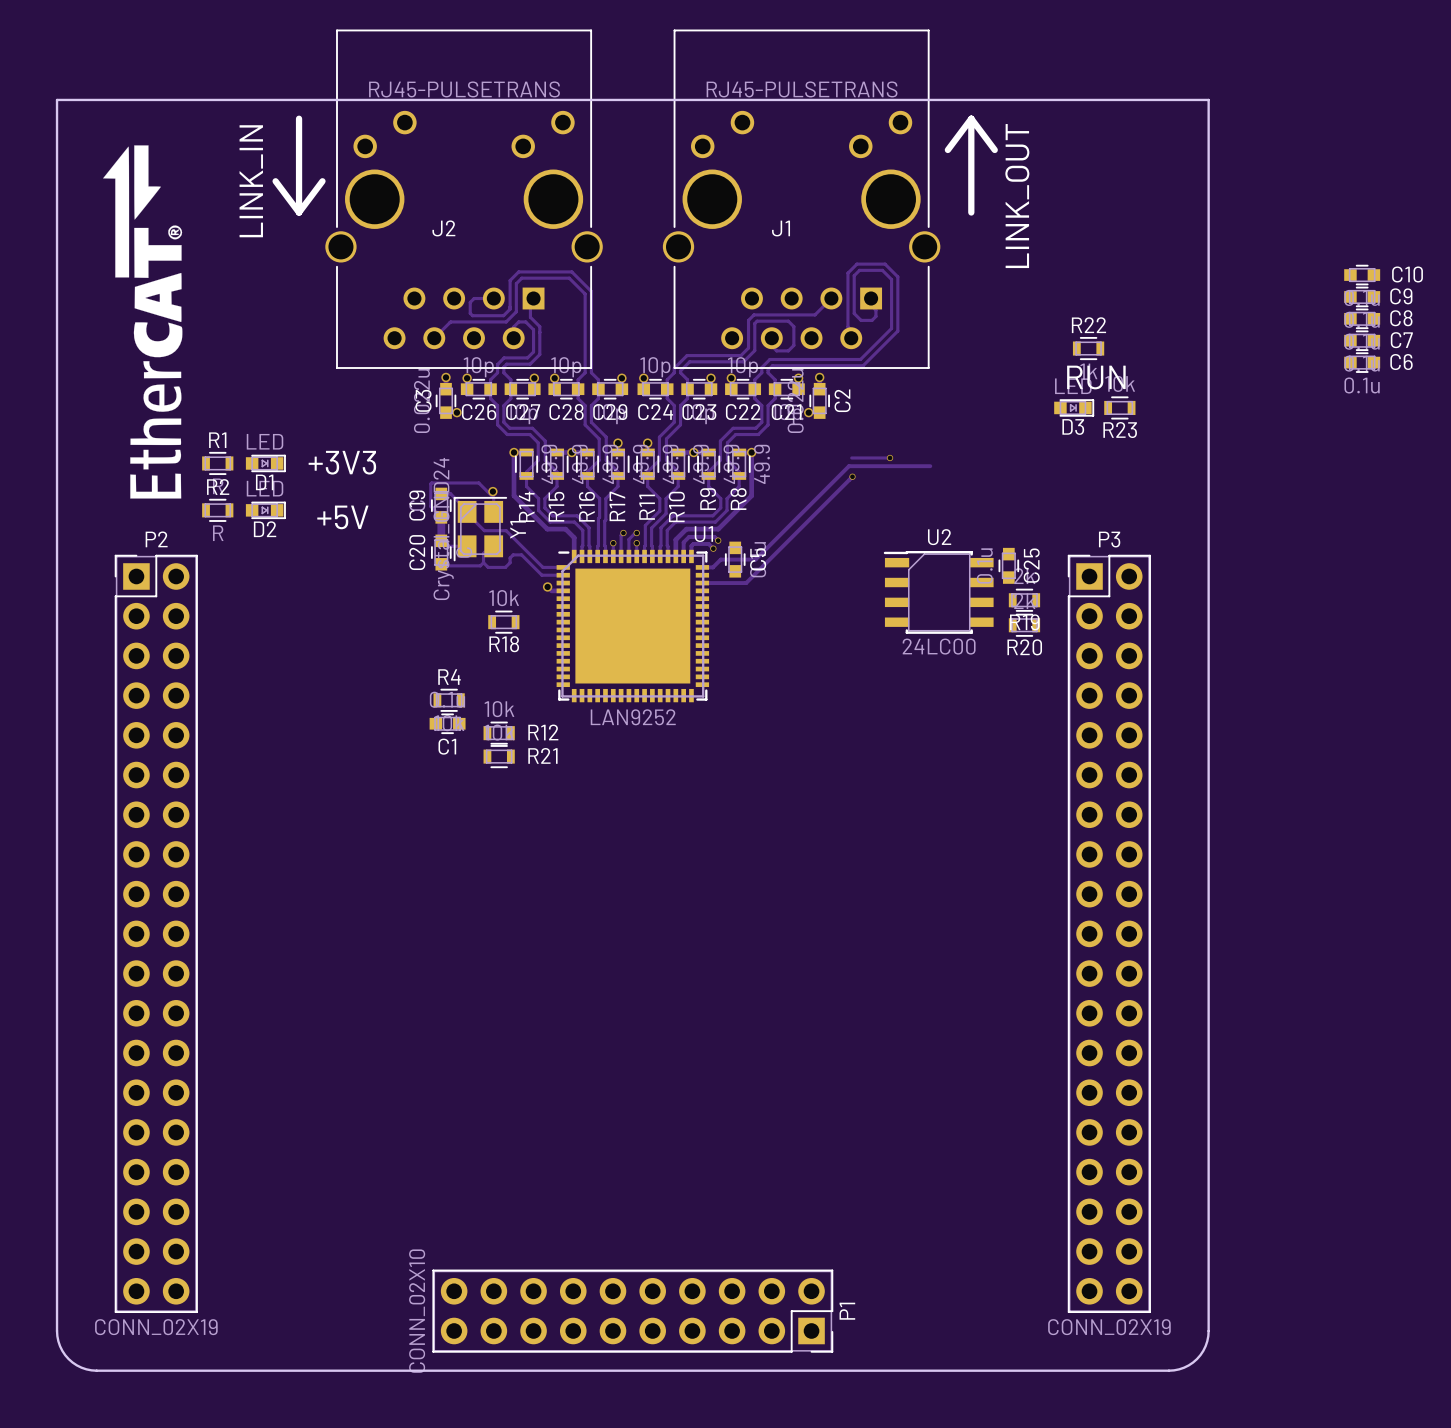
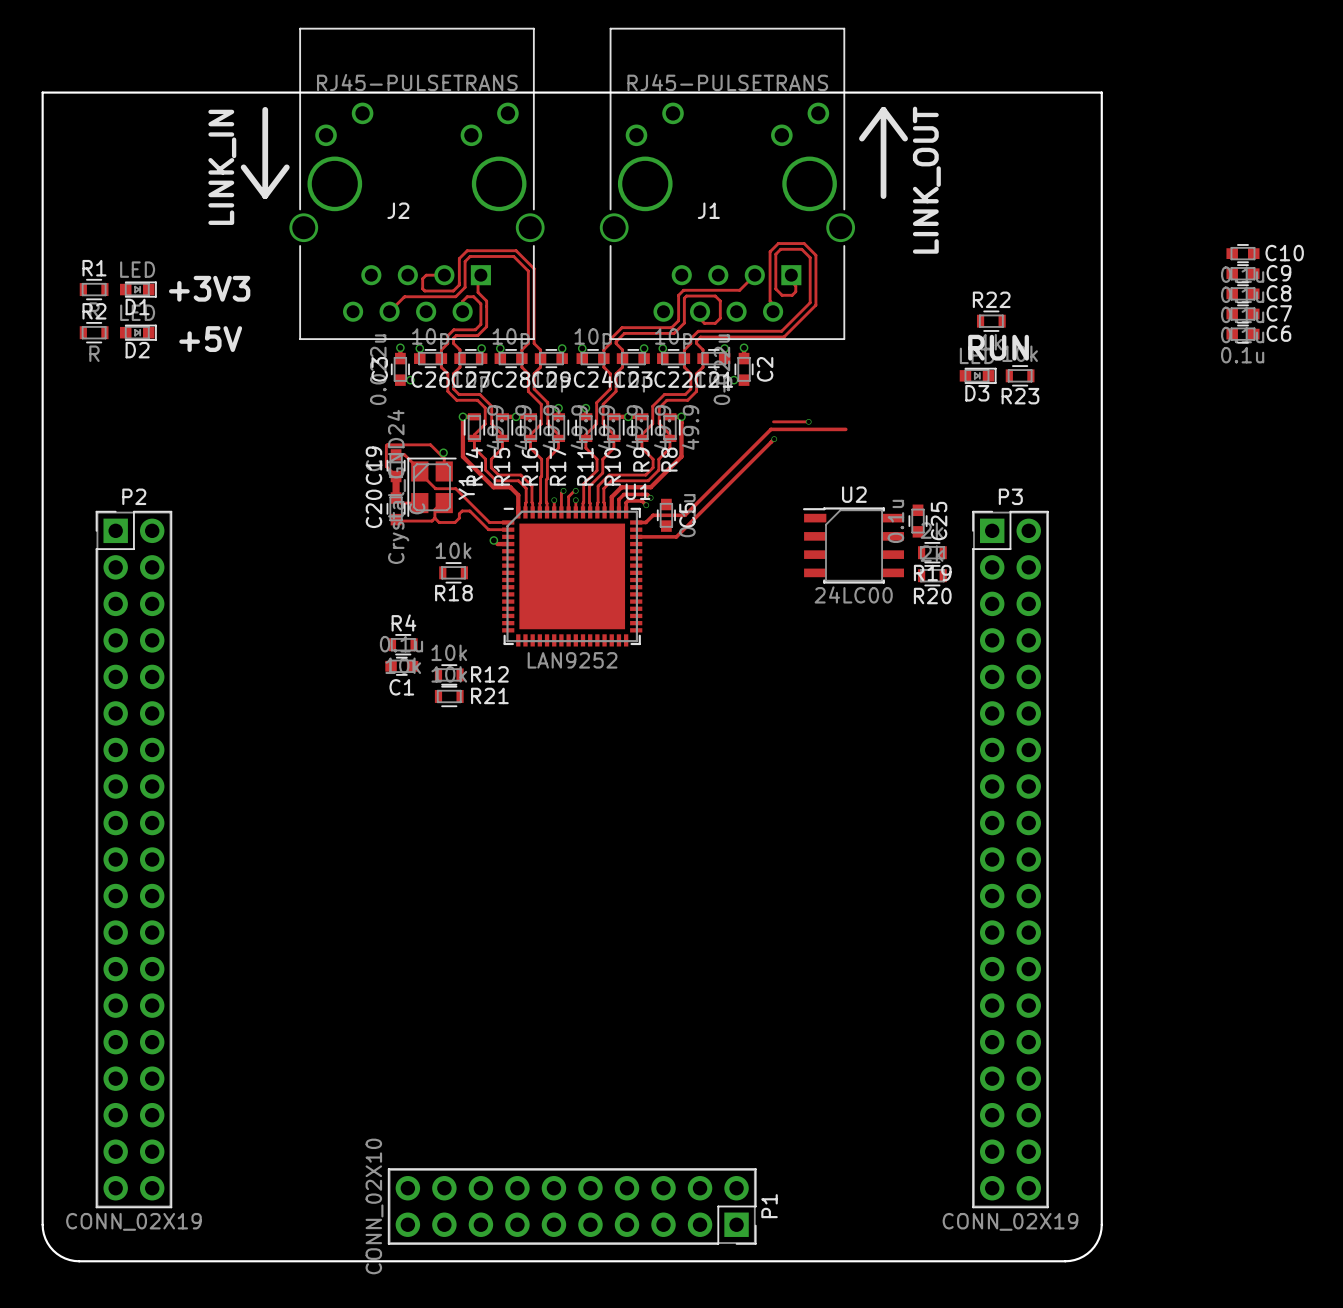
drawing: [103, 145, 183, 499] -> none
text position: +3V3 (342, 462) -> +3V3 (209, 288)
R1 position: (217, 463) -> (94, 289)
D1 position: (265, 463) -> (138, 289)
R2 position: (217, 510) -> (94, 332)
D2 position: (265, 510) -> (138, 332)
text position: +5V (342, 517) -> +5V (210, 339)

